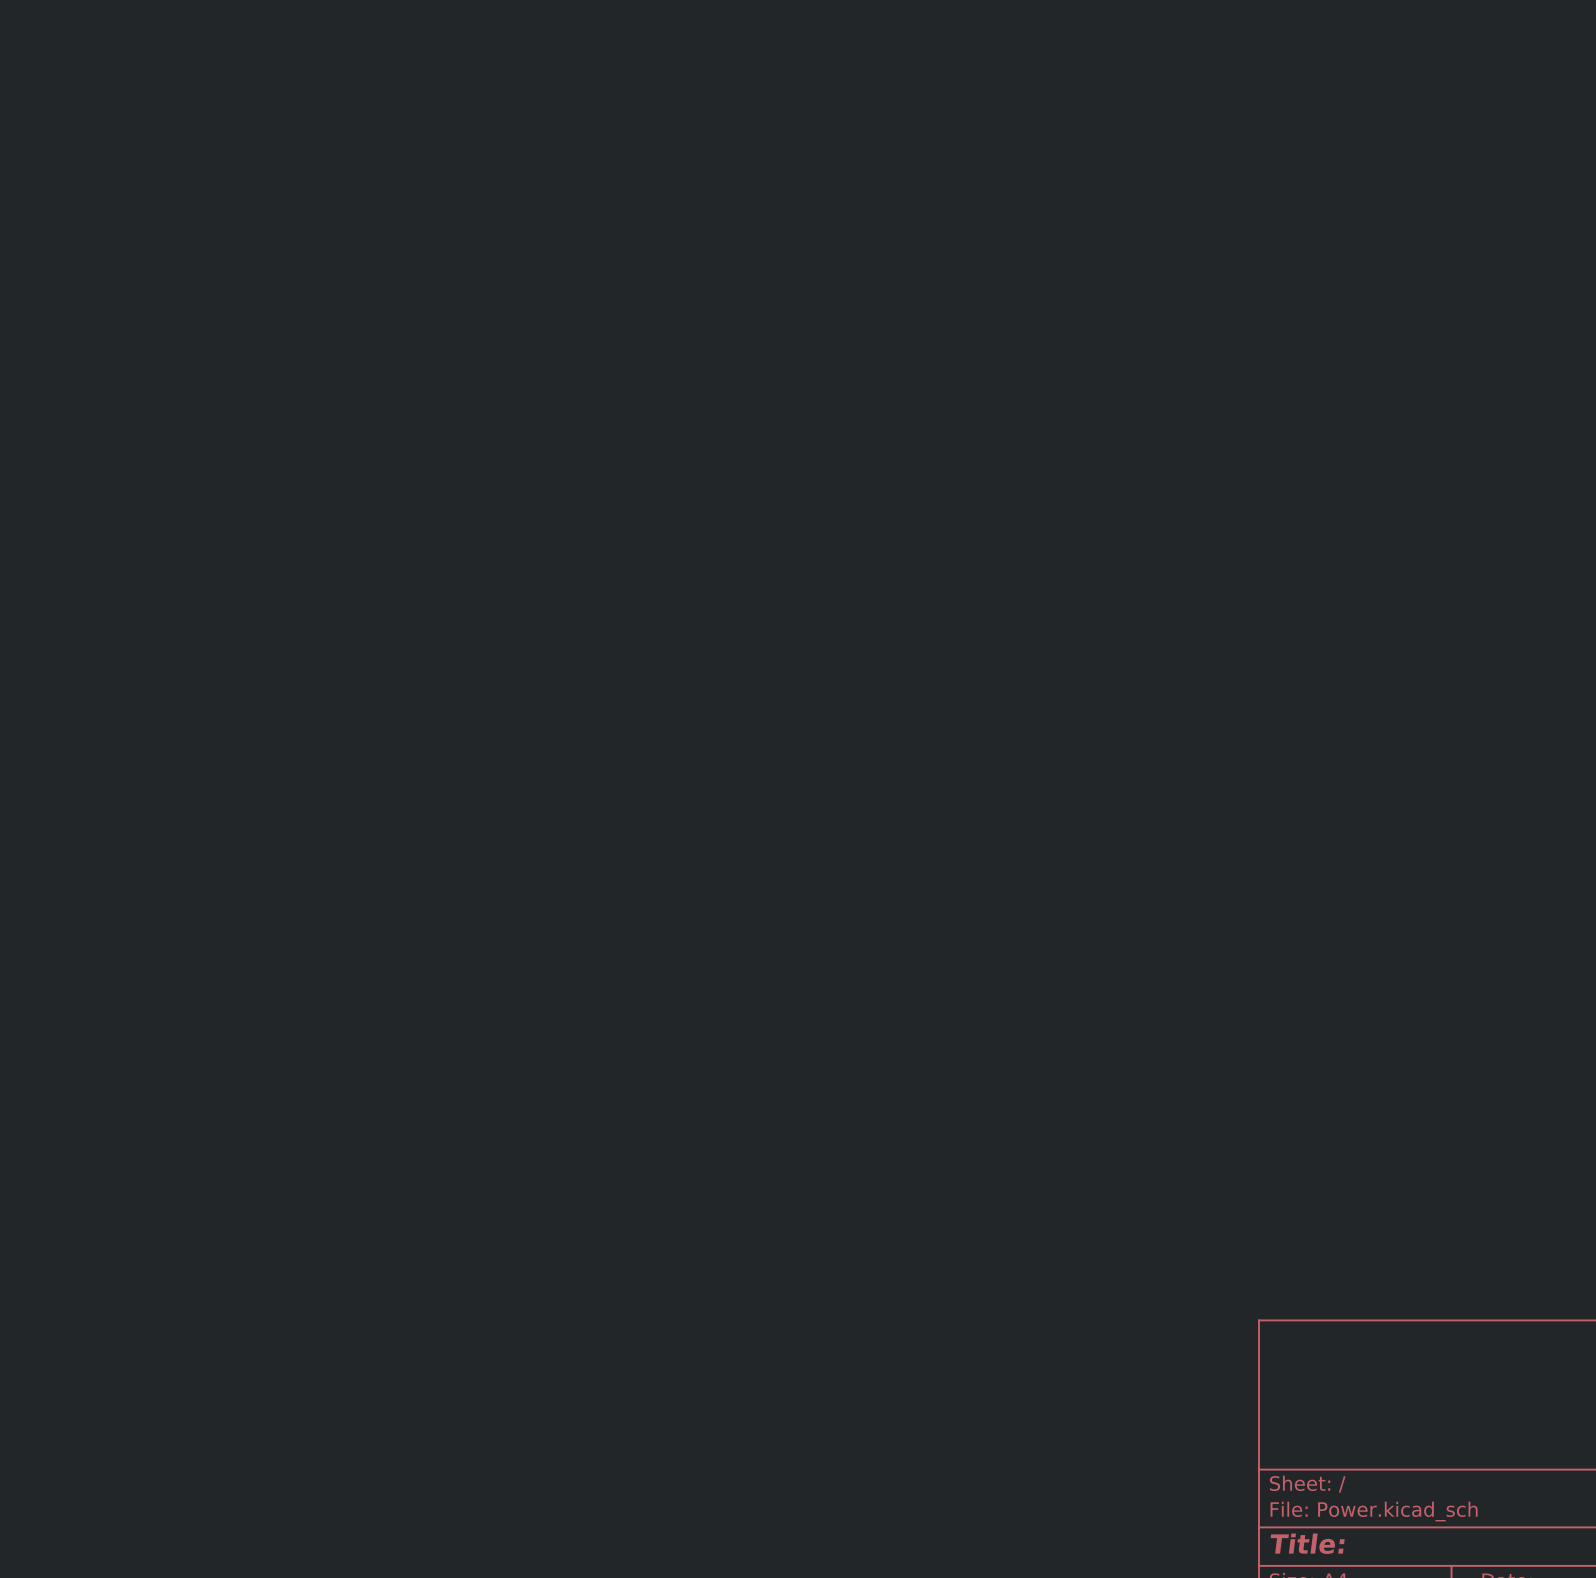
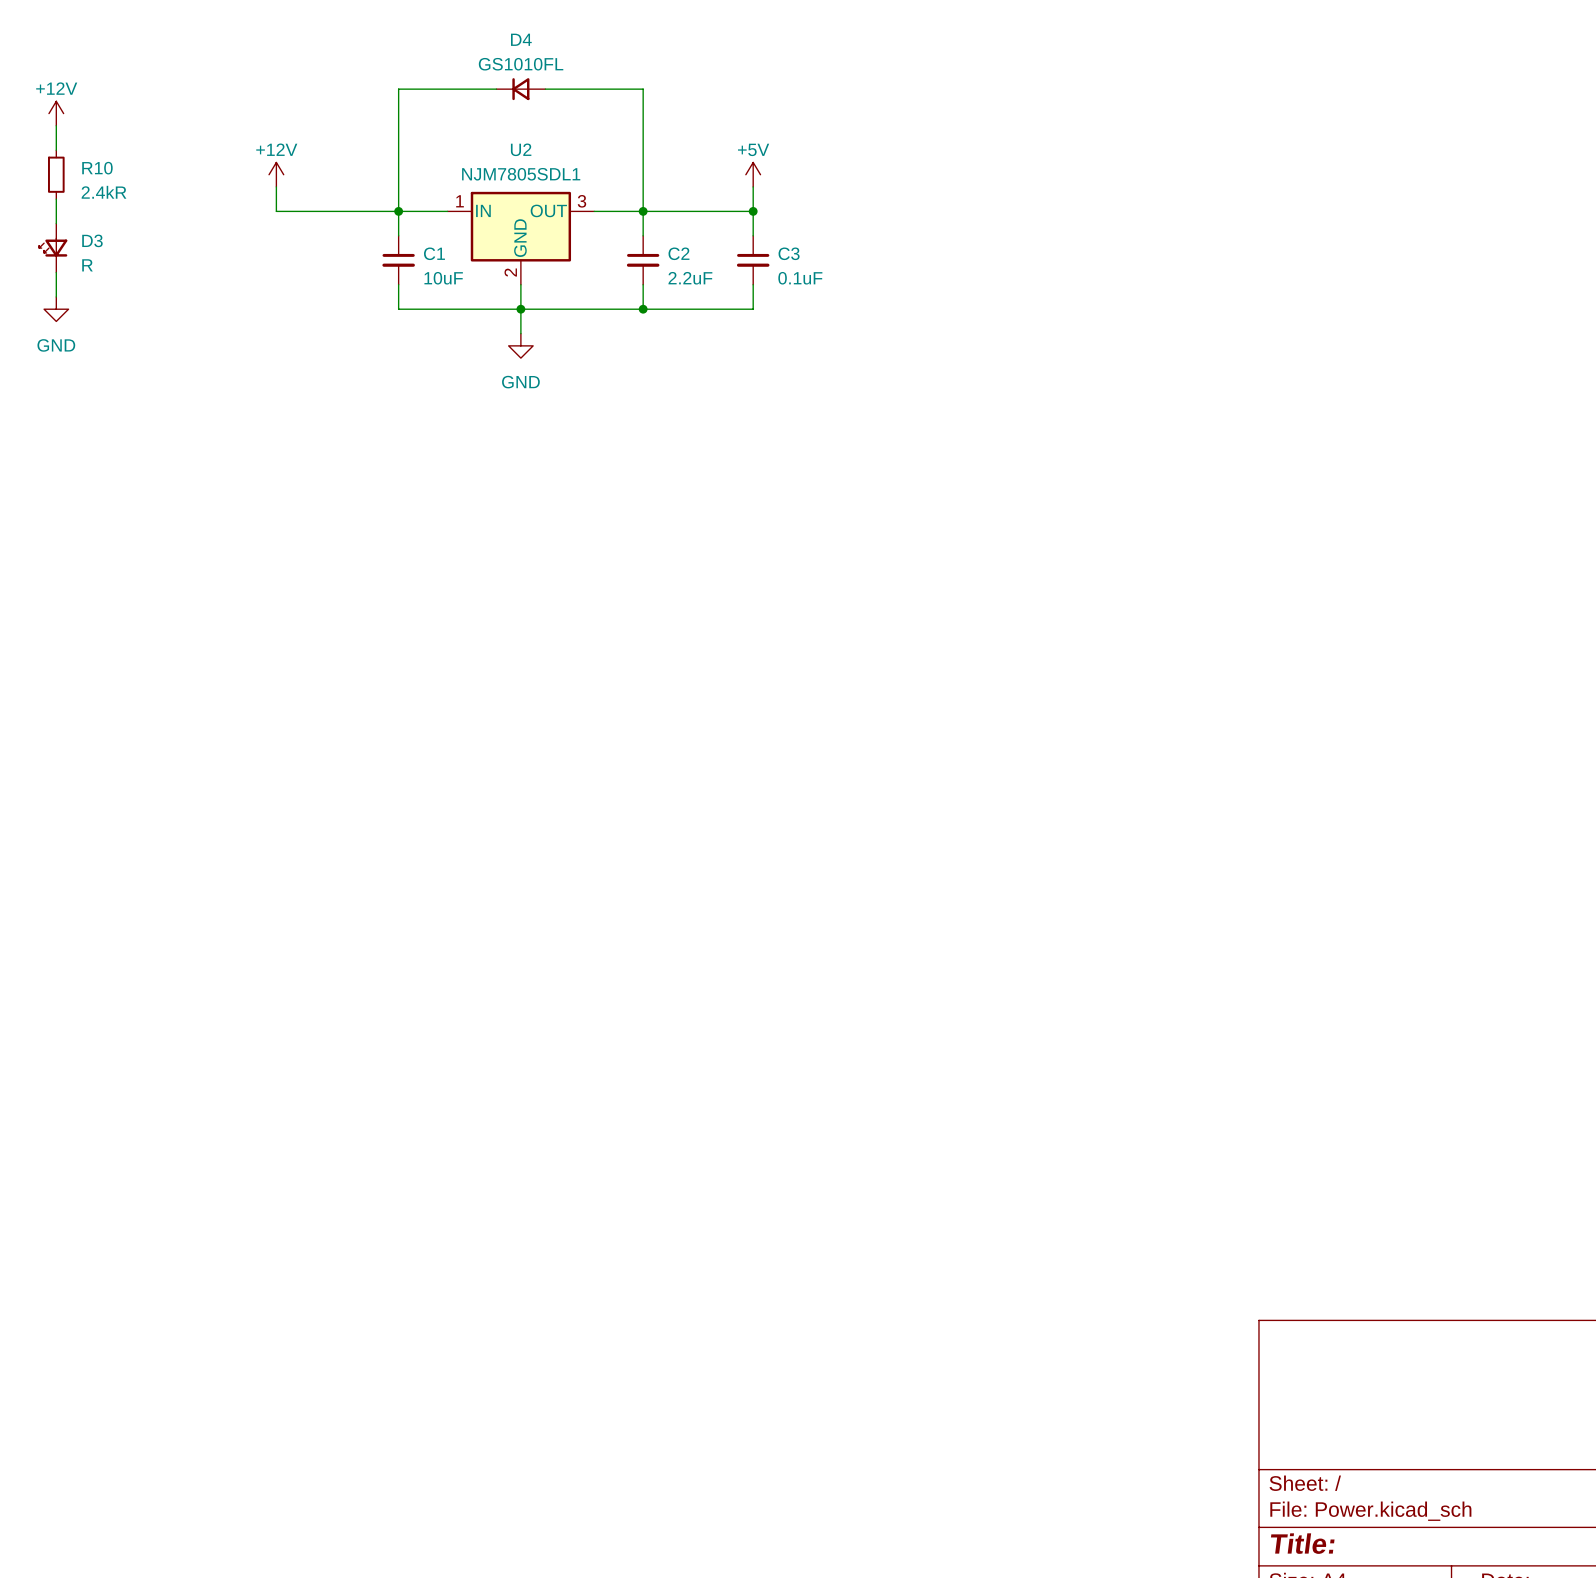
wire: none -> (496, 89) (398, 89) (398, 235)
D4: none -> GS1010FL (520, 89)
wire: none -> (545, 89) (643, 89) (643, 235)
power symbol: none -> +12V (56, 113)
wire: none -> (56, 125) (56, 150)
R10: none -> 2.4kR (56, 174)
power symbol: none -> +12V (276, 174)
power symbol: none -> +5V (753, 174)
wire: none -> (276, 186) (276, 211) (447, 211)
wire: none -> (753, 186) (753, 235)
wire: none -> (56, 199) (56, 223)
junction: none -> (398, 211)
wire: none -> (594, 211) (753, 211)
junction: none -> (643, 211)
junction: none -> (753, 211)
U2: none -> NJM7805SDL1 (520, 238)
D3: none -> R (53, 248)
C1: none -> 10uF (398, 260)
C2: none -> 2.2uF (643, 260)
C3: none -> 0.1uF (753, 260)
wire: none -> (56, 272) (56, 296)
wire: none -> (398, 284) (398, 309) (753, 309) (753, 284)
wire: none -> (520, 284) (520, 333)
wire: none -> (643, 284) (643, 309)
power symbol: none -> GND (56, 309)
junction: none -> (520, 309)
junction: none -> (643, 309)
power symbol: none -> GND (520, 345)

